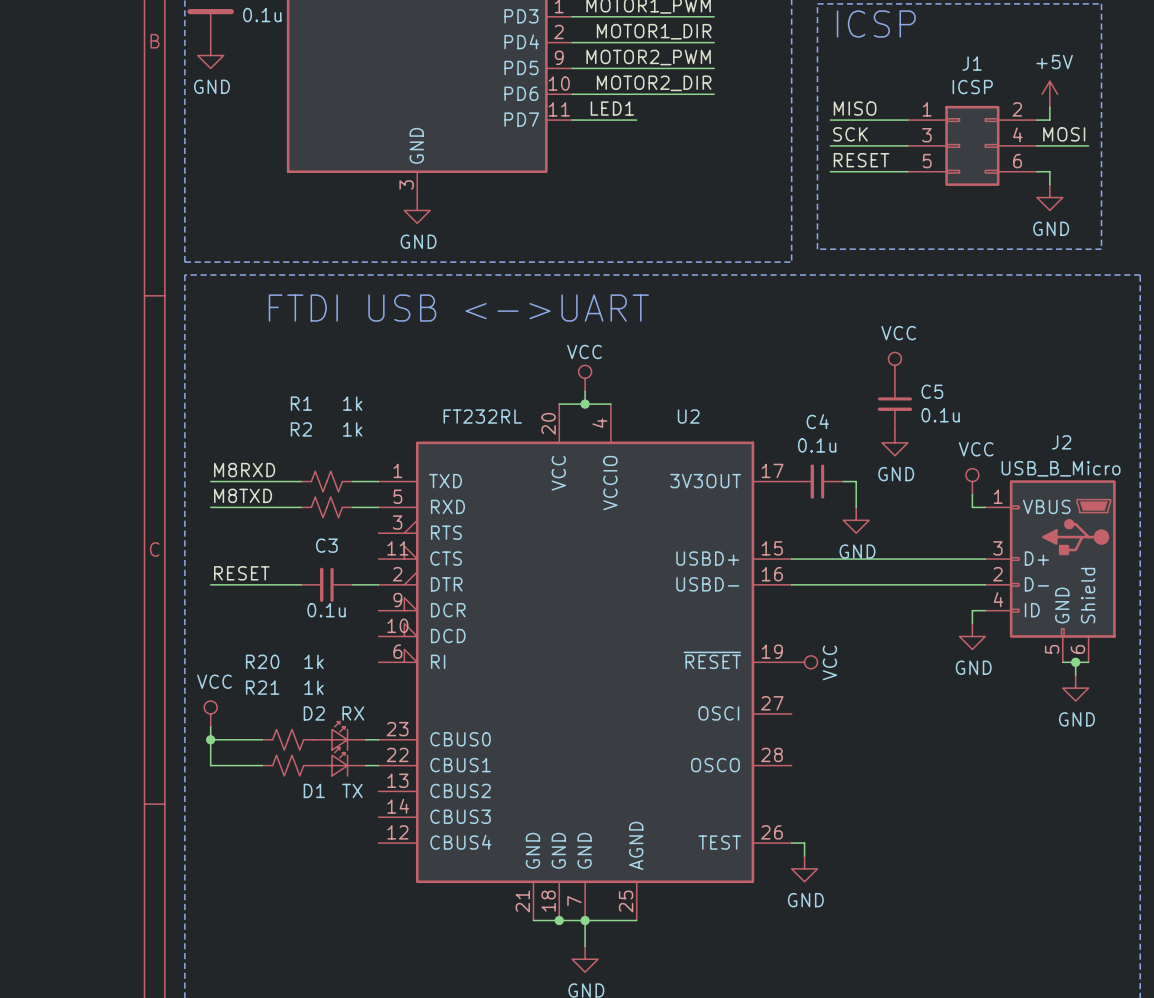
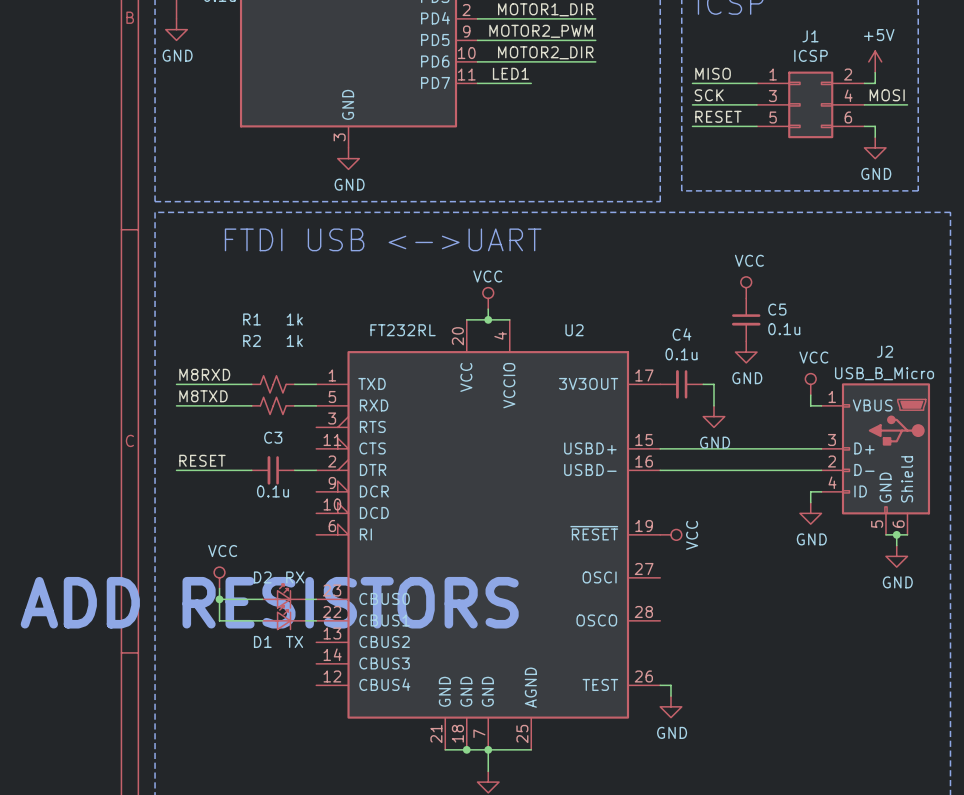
power symbol position: VCC (210, 713) -> VCC (219, 577)
wire: (210, 726) (210, 765) (262, 765) -> (219, 588) (219, 620) (262, 620)
junction position: (210, 739) -> (219, 599)
R20: 1k (288, 739) -> none
text: none -> ADD RESISTORS (269, 602)
R21: 1k (288, 765) -> none

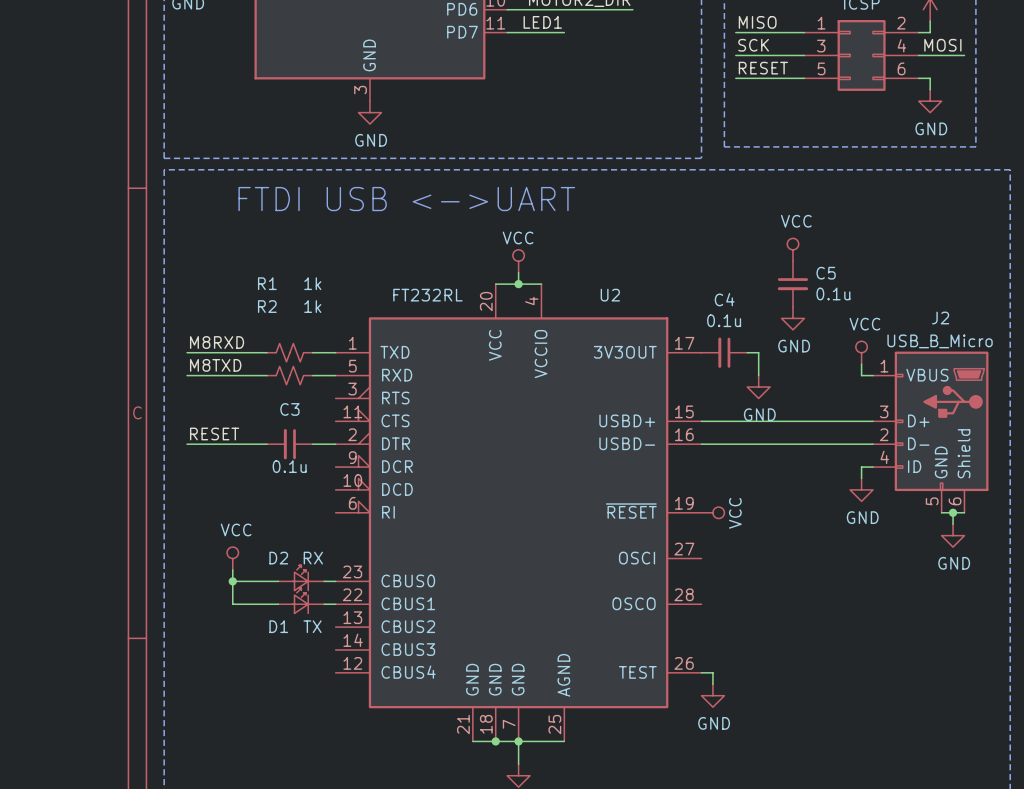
text: ADD RESISTORS (269, 602) -> none

